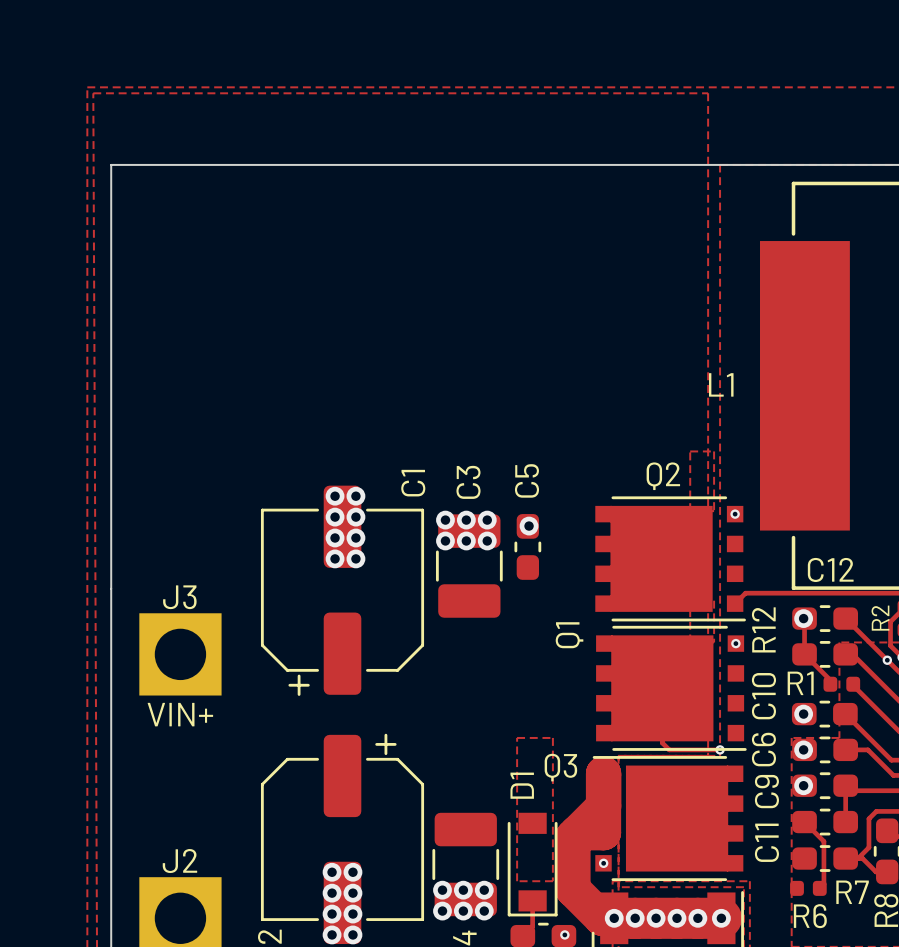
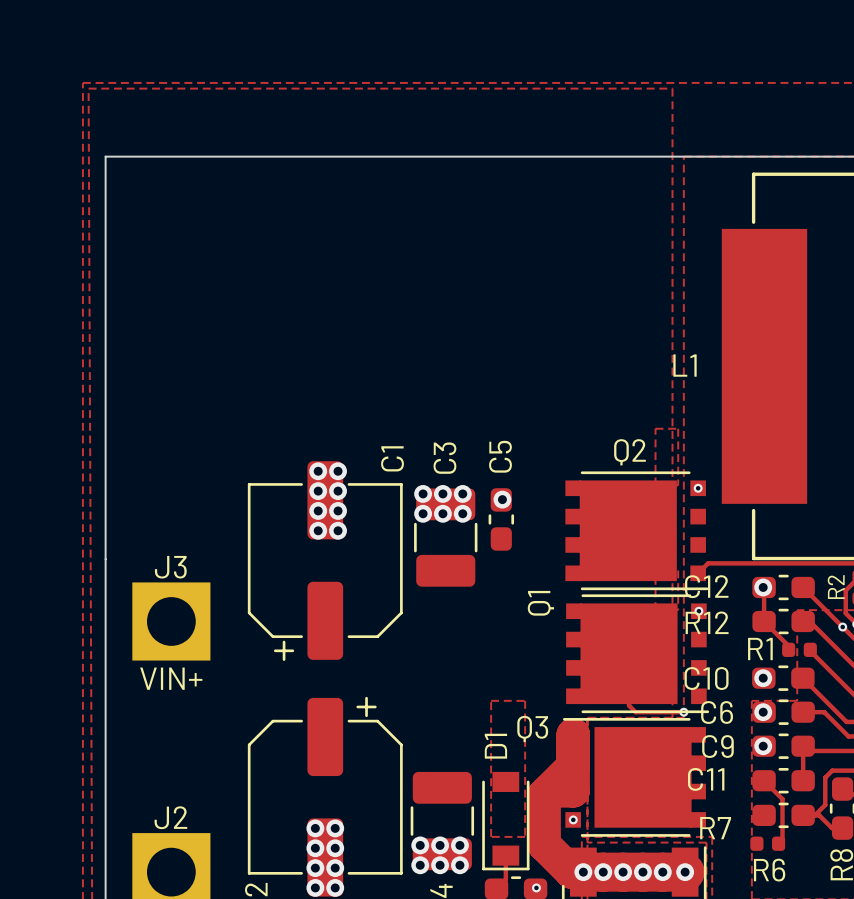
C12 name position: C12 (830, 569) -> C12 (706, 586)
R12 name rotation: 0° (763, 629) -> 90° clockwise (707, 622)
C10 name rotation: 0° (763, 696) -> 90° clockwise (706, 678)
C6 name rotation: 0° (763, 749) -> 90° clockwise (717, 712)
C9 name rotation: 0° (766, 791) -> 90° clockwise (717, 746)
C11 name rotation: 0° (766, 842) -> 90° clockwise (706, 779)
R7 name position: R7 (852, 892) -> R7 (715, 828)

